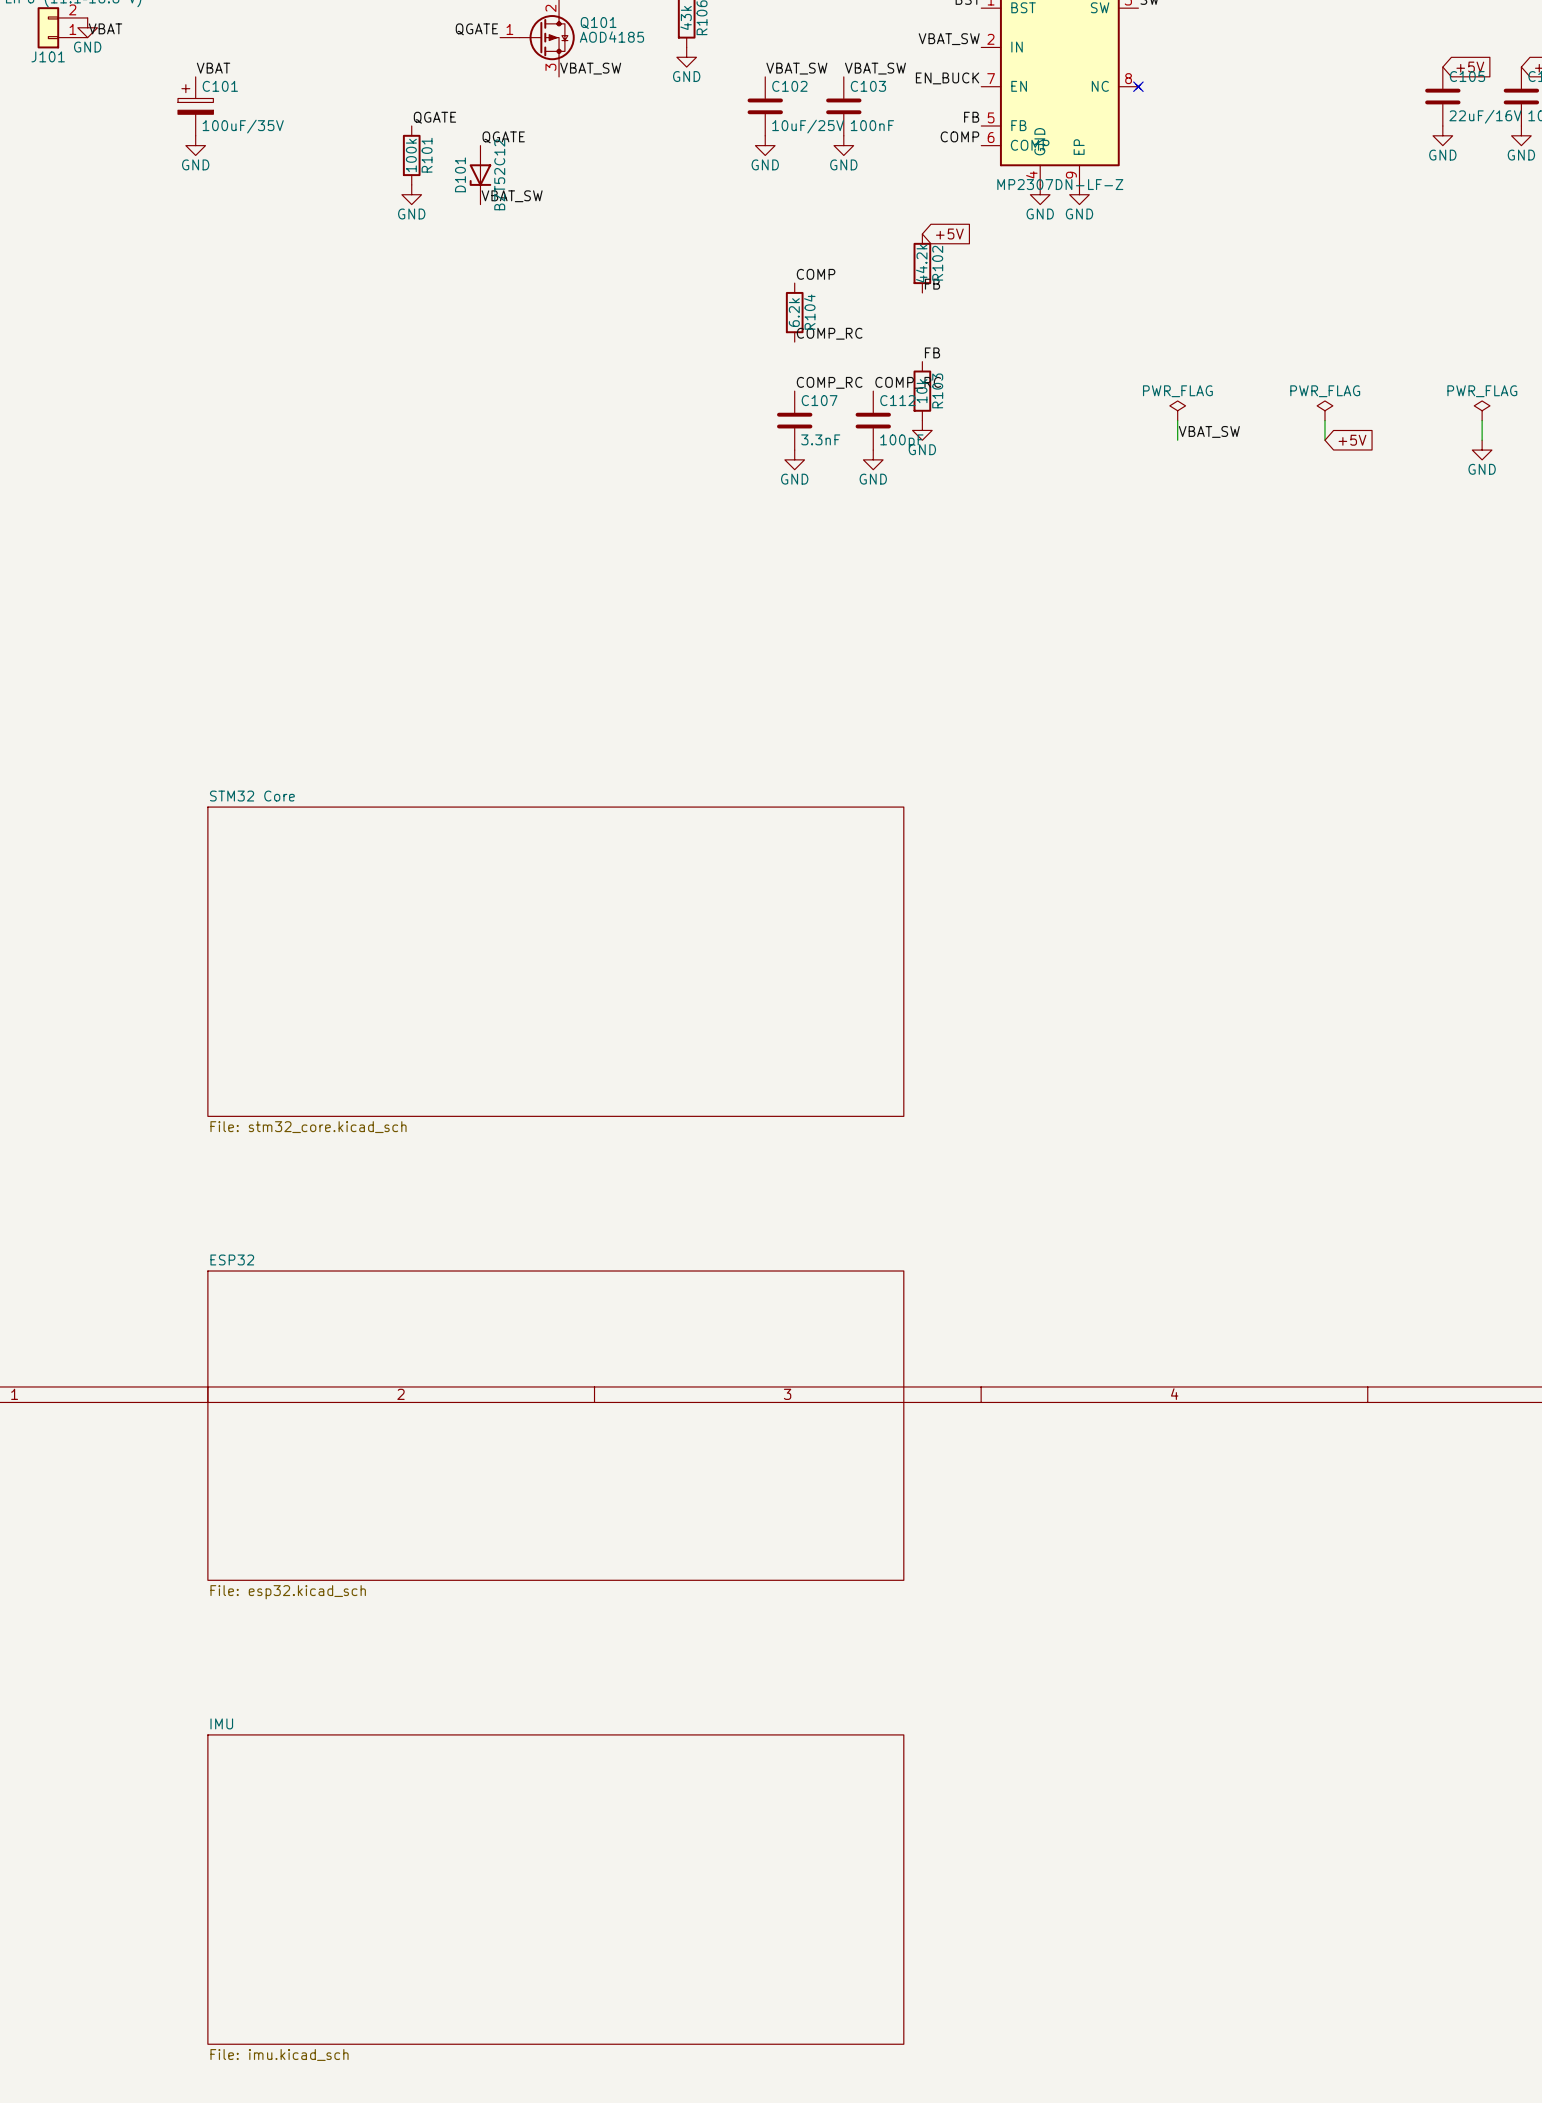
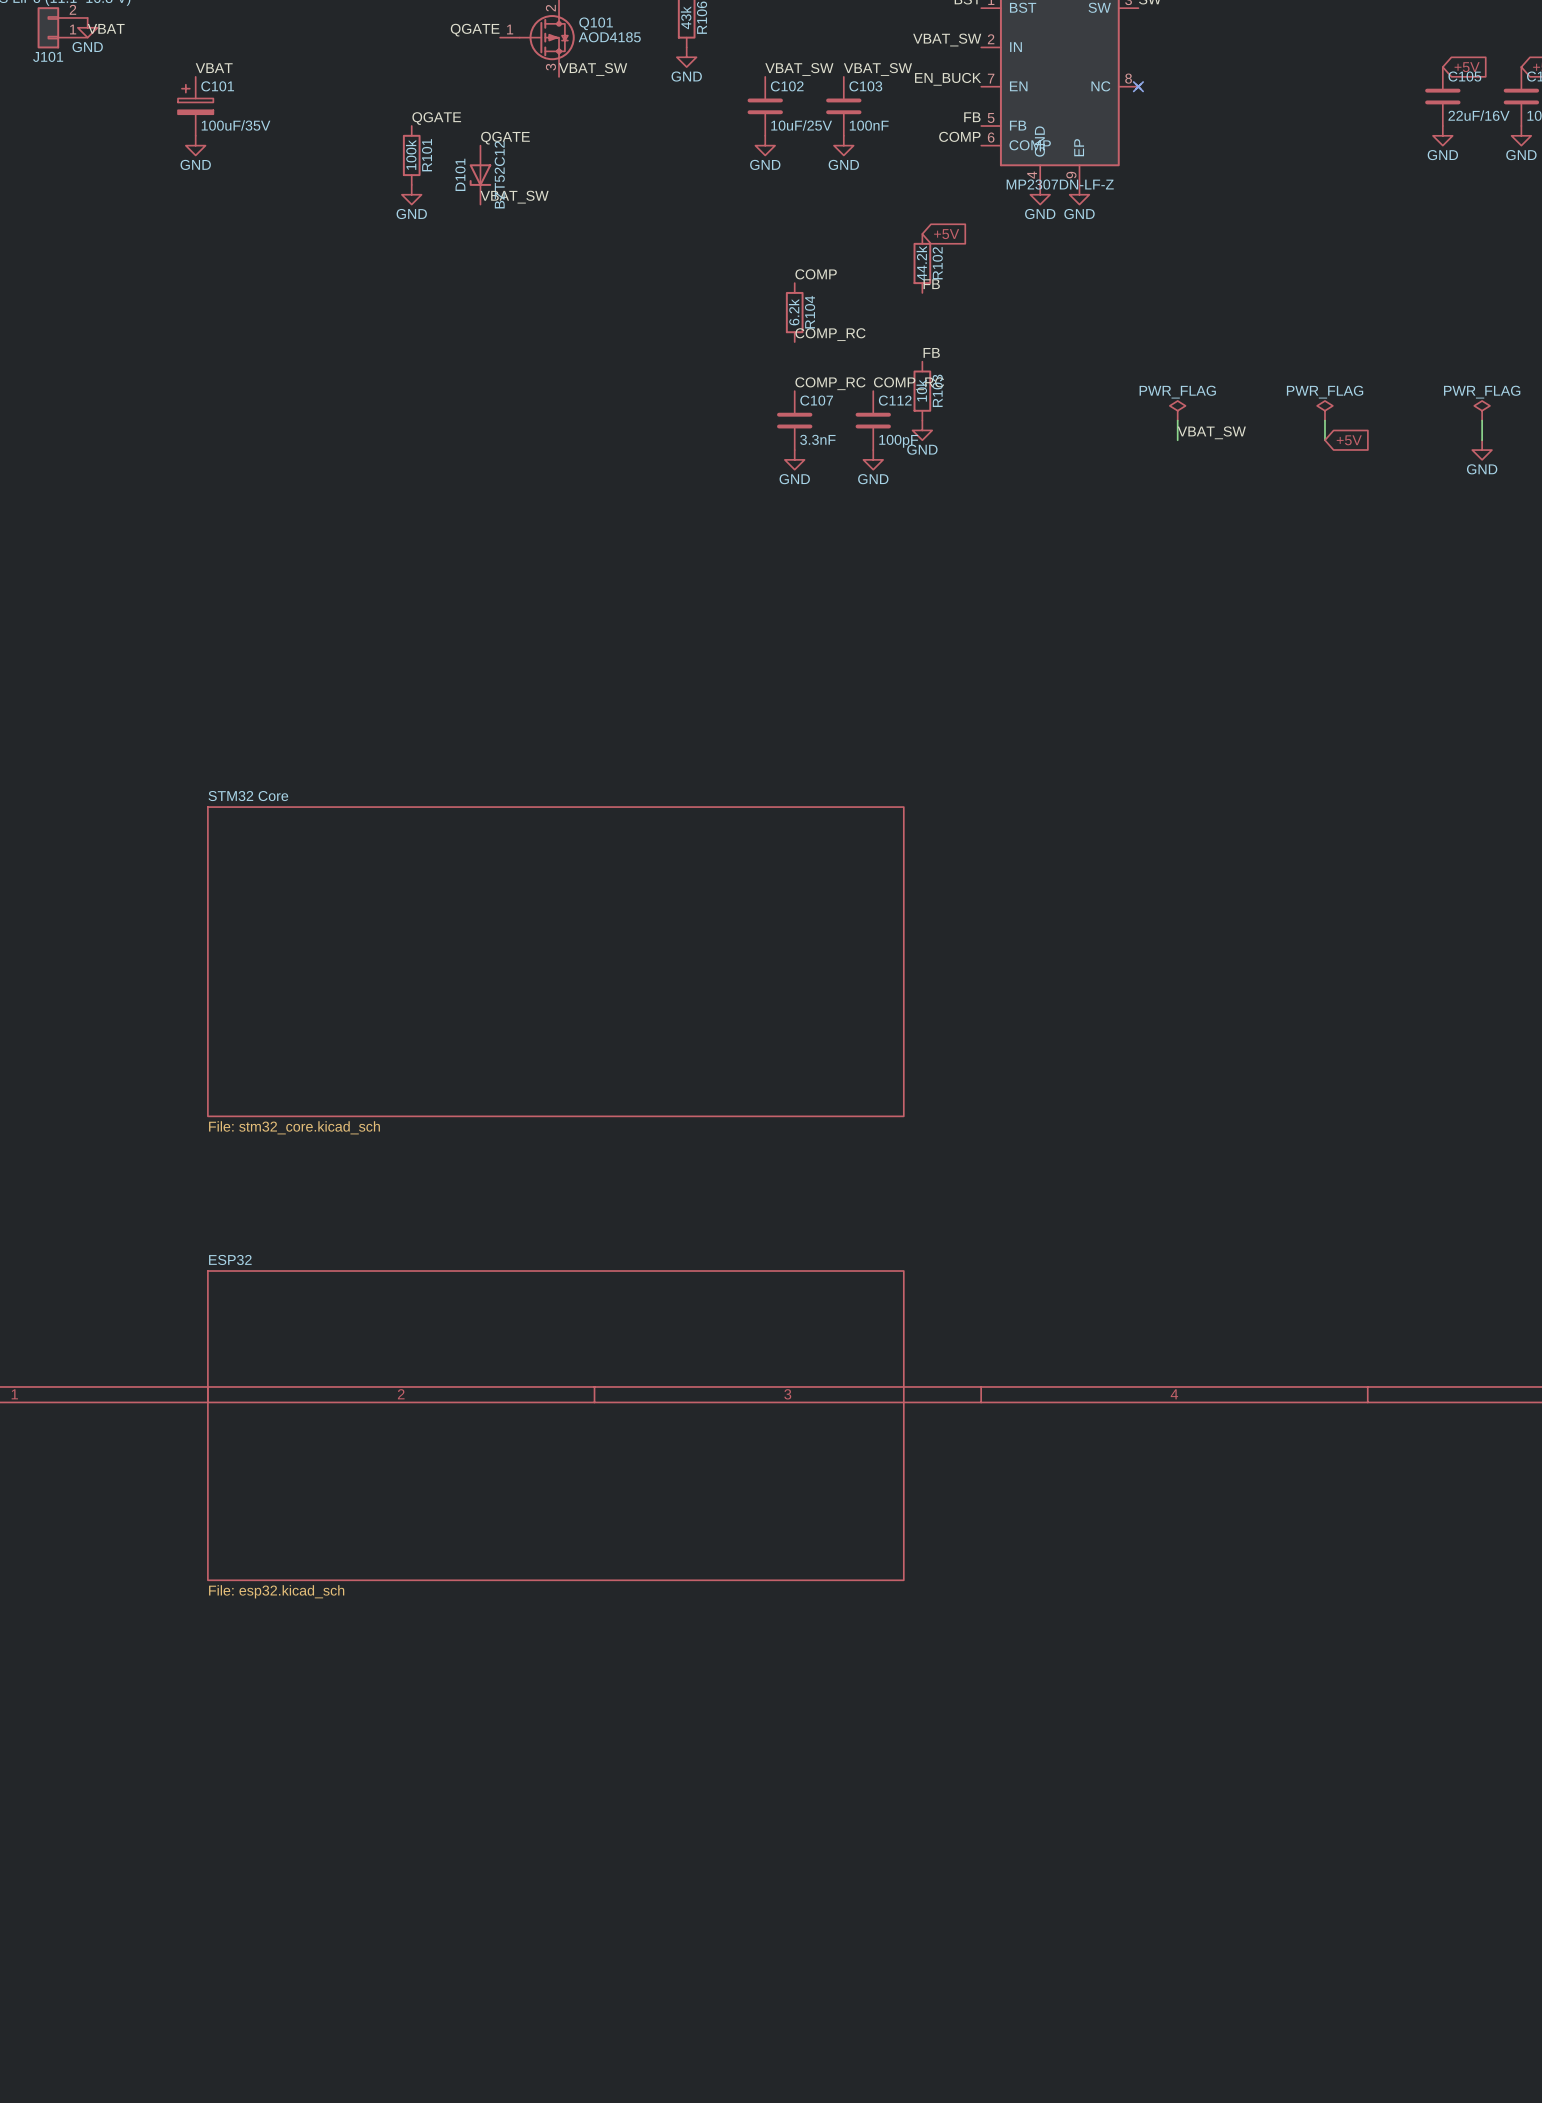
sheet IMU: File: imu.kicad_sch (555, 1889) -> none

